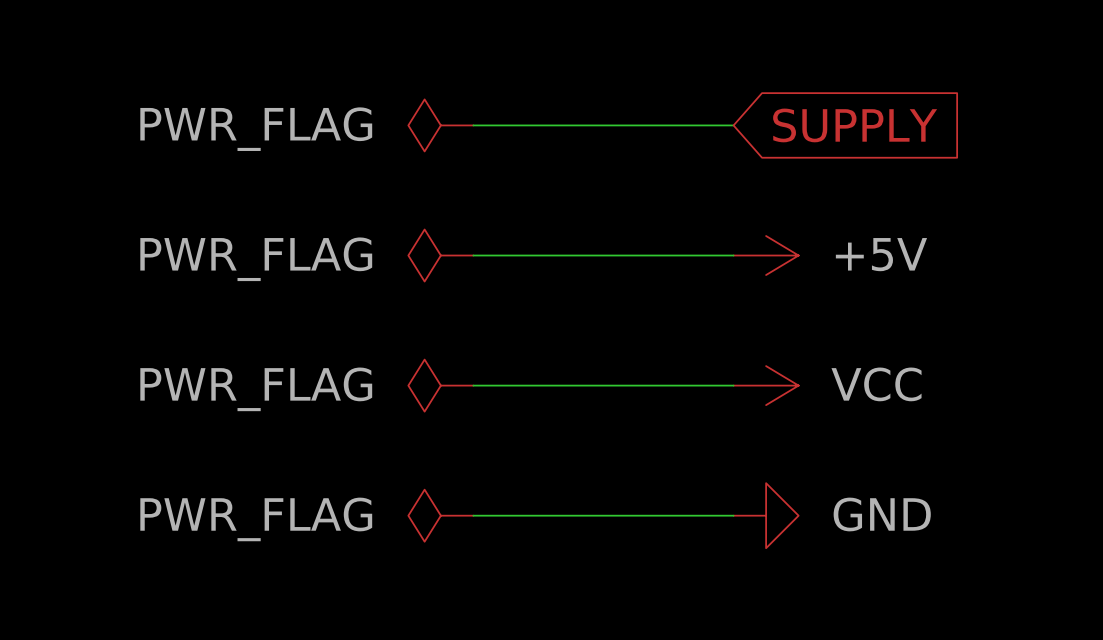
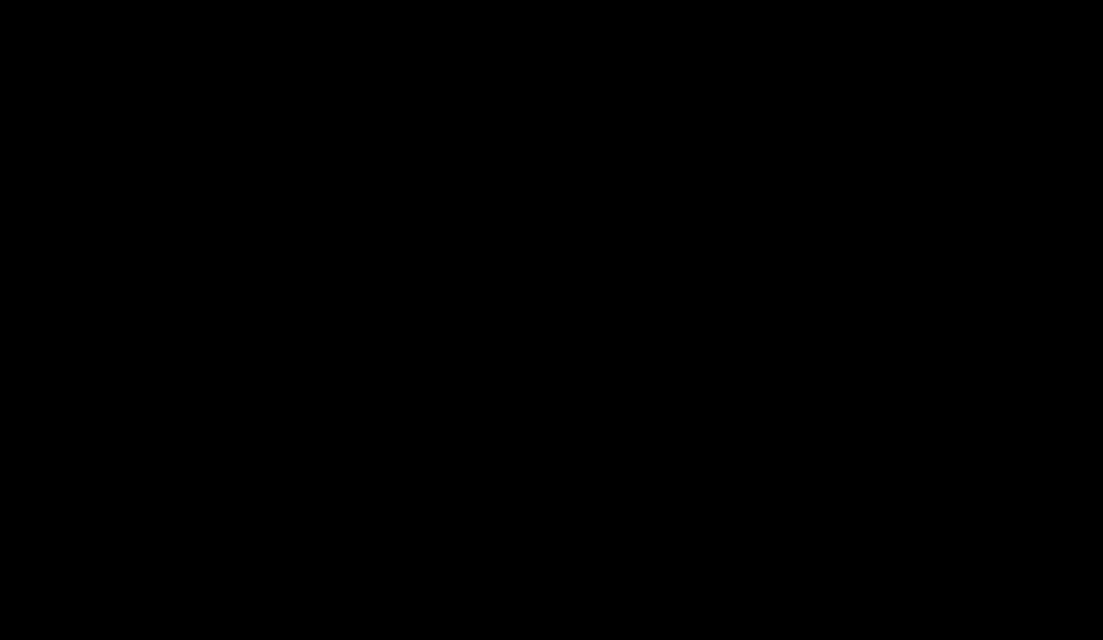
power symbol: PWR_FLAG (440, 125) -> none
wire: (473, 125) (733, 125) -> none
global label: SUPPLY (855, 125) -> none
power symbol: PWR_FLAG (440, 255) -> none
wire: (473, 255) (733, 255) -> none
power symbol: +5V (766, 255) -> none
power symbol: PWR_FLAG (440, 385) -> none
wire: (473, 385) (733, 385) -> none
power symbol: VCC (766, 385) -> none
power symbol: PWR_FLAG (440, 515) -> none
wire: (473, 515) (733, 515) -> none
power symbol: GND (766, 515) -> none

